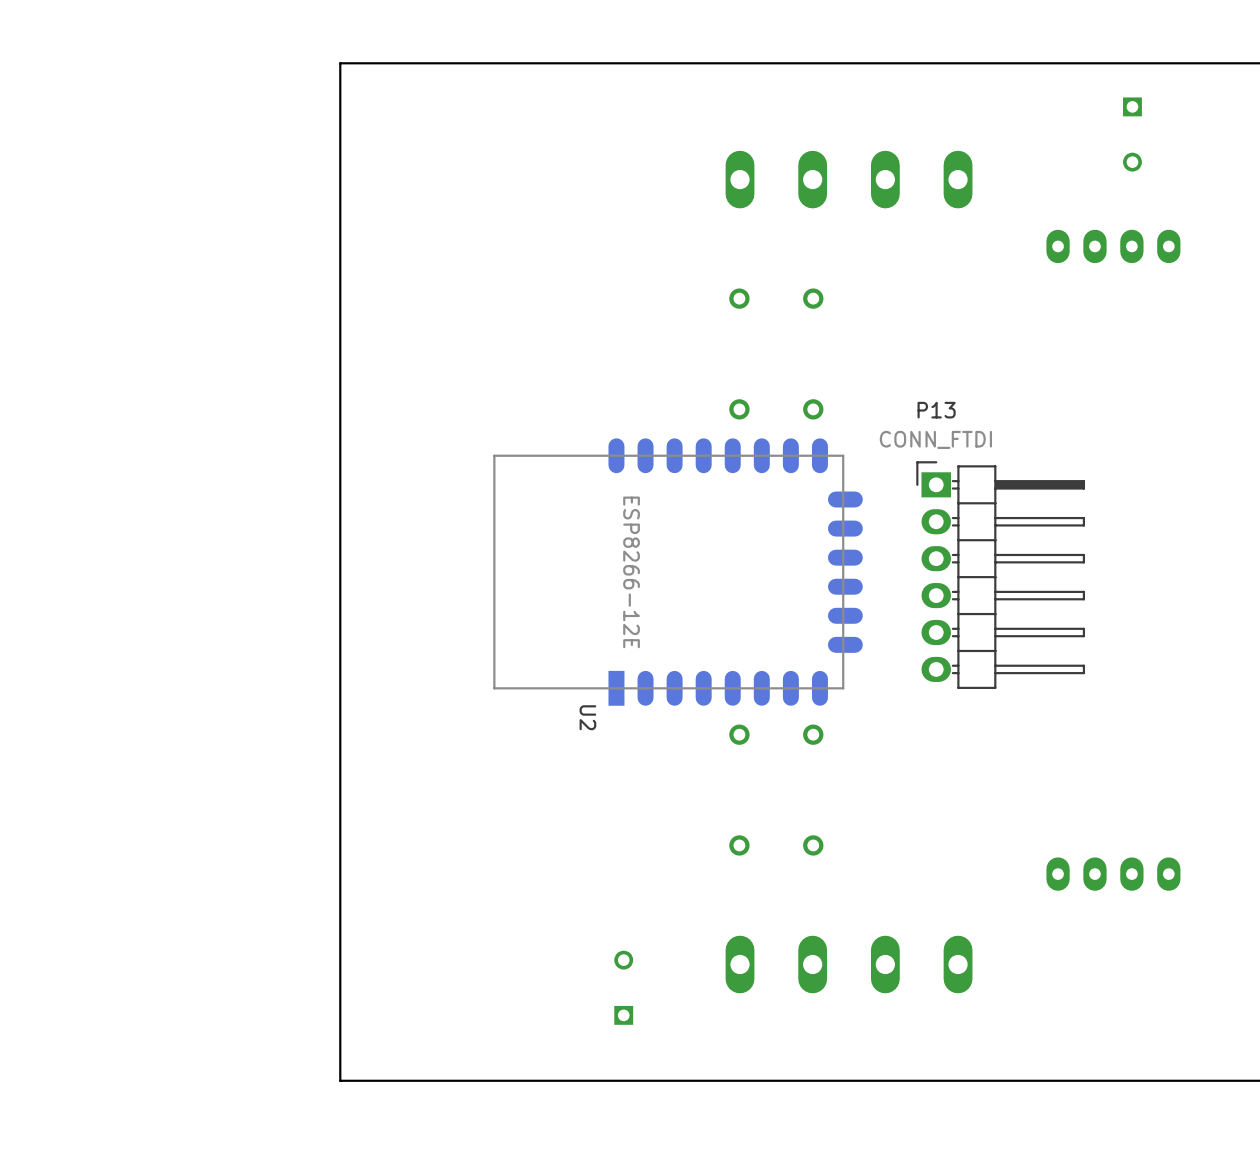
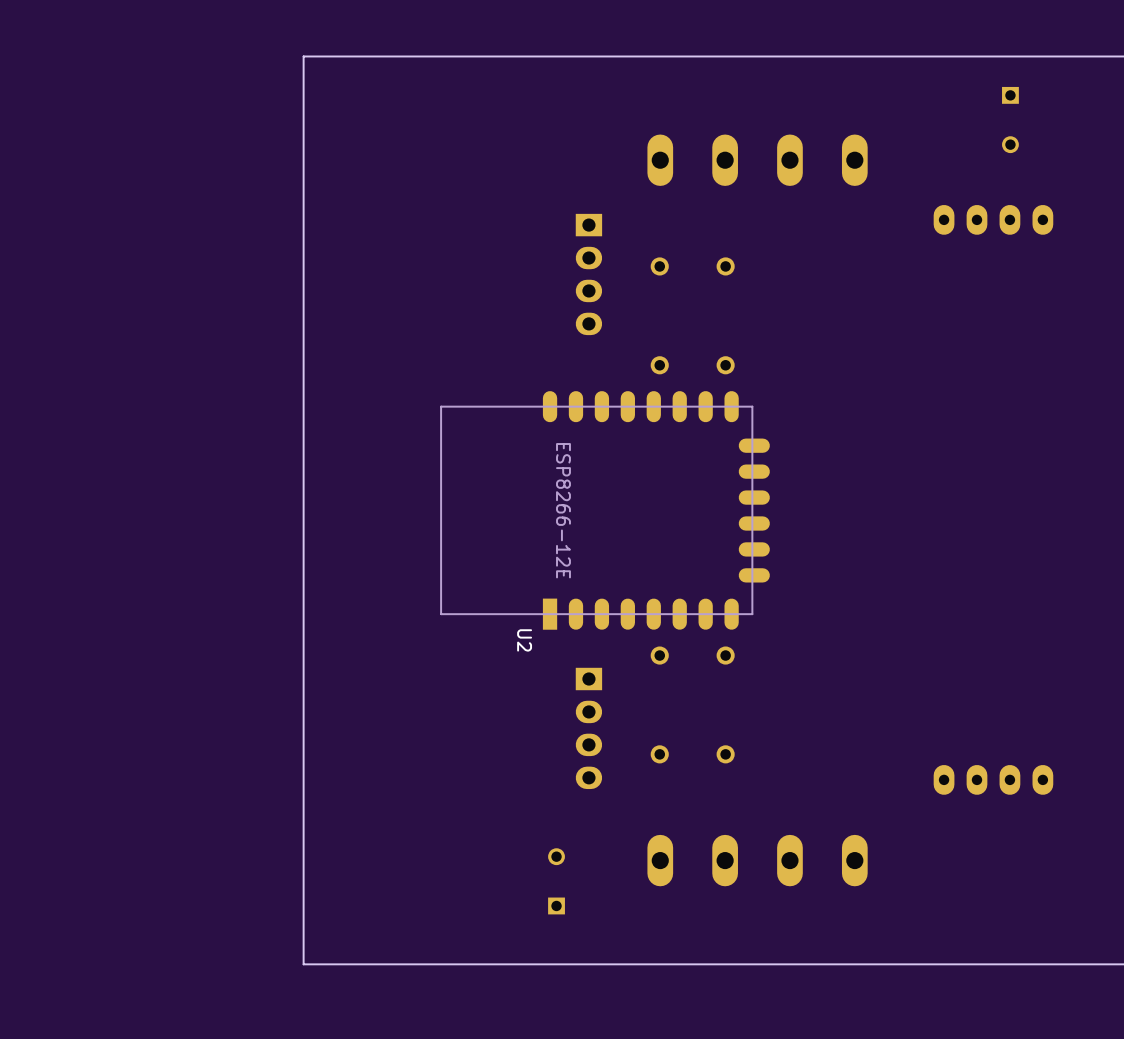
part: none -> (588, 274)
P13: CONN_FTDI (1000, 575) -> none
part: none -> (588, 728)

